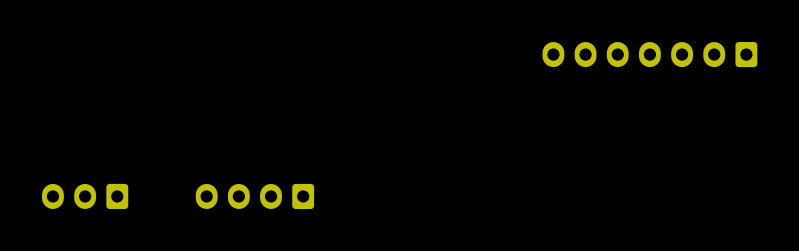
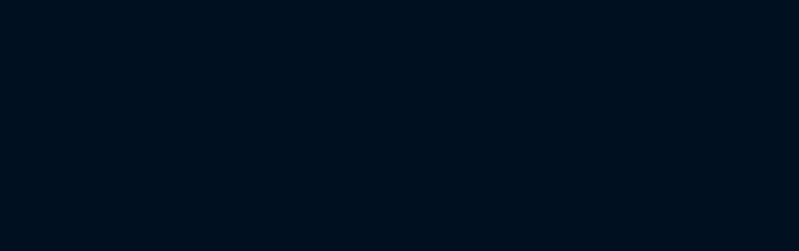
part: (649, 54) -> none
part: (85, 196) -> none
part: (254, 196) -> none

